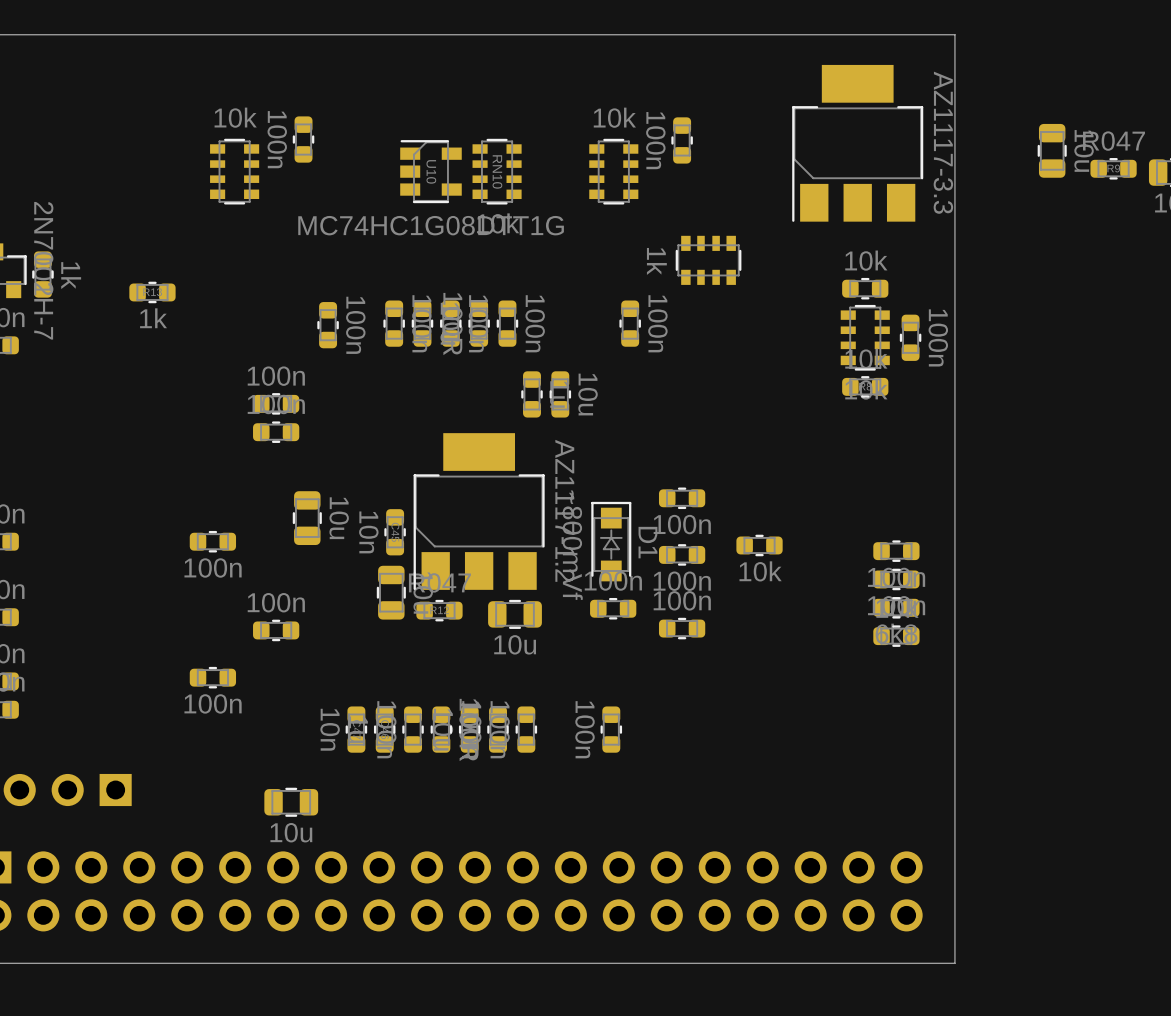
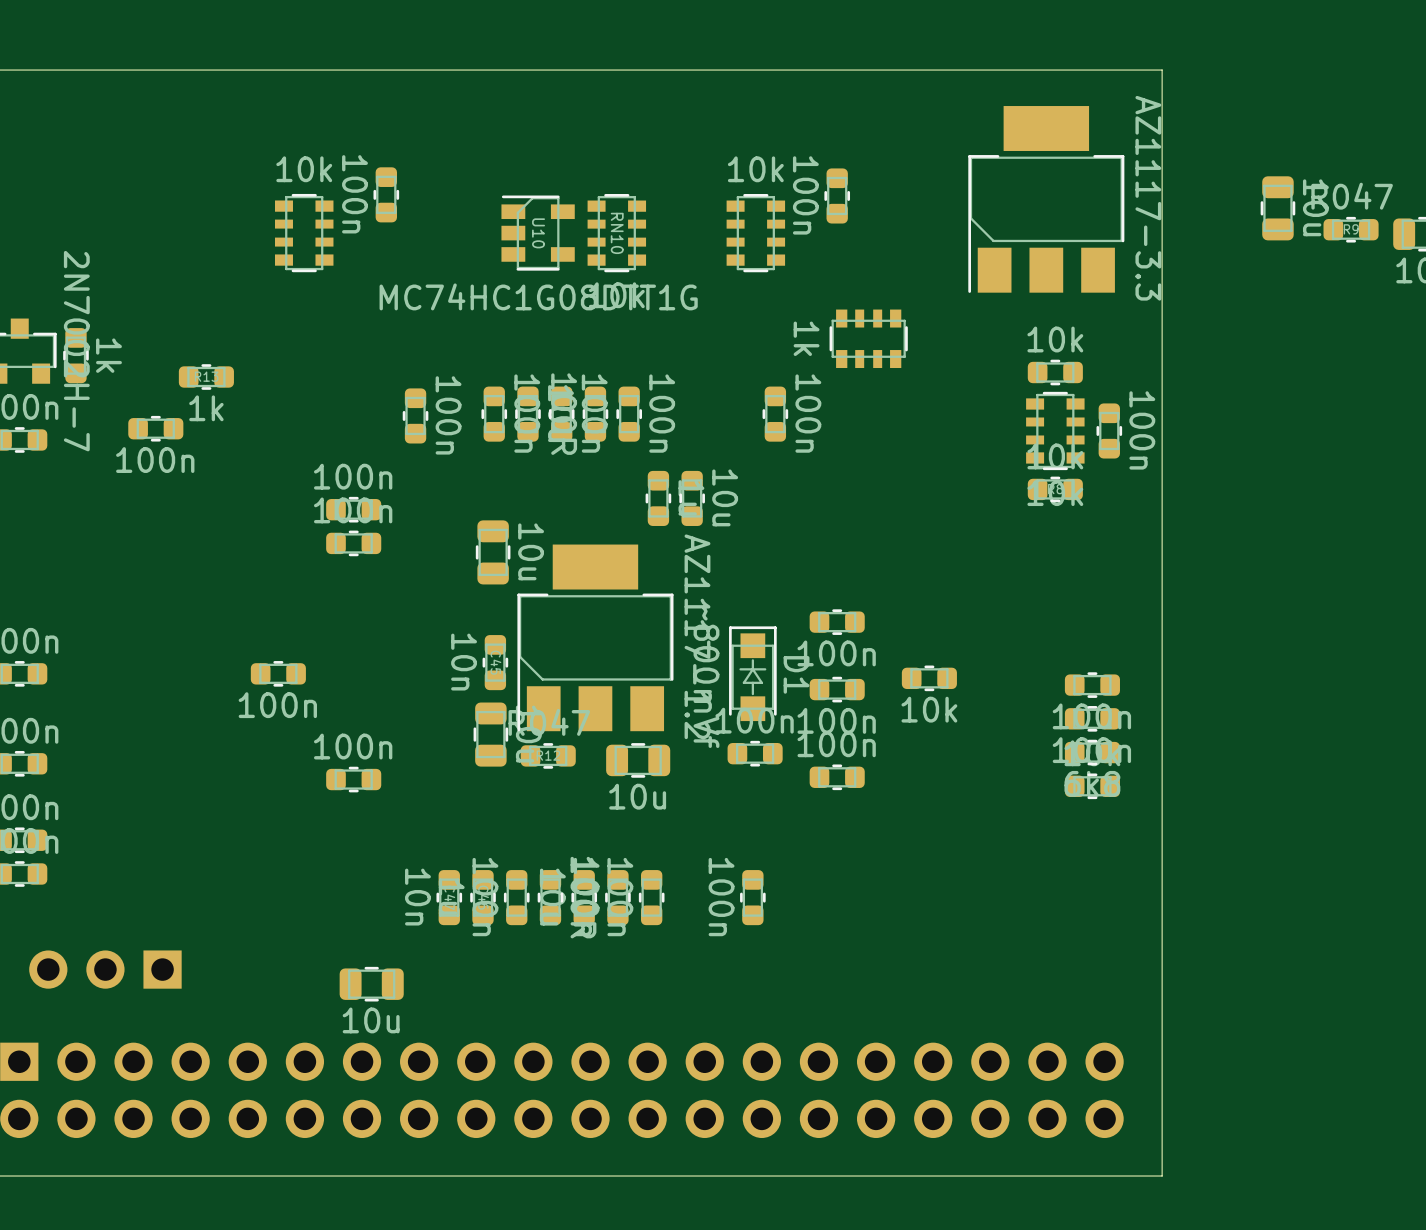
part position: (307, 518) -> (493, 552)
part position: (212, 677) -> (155, 428)

